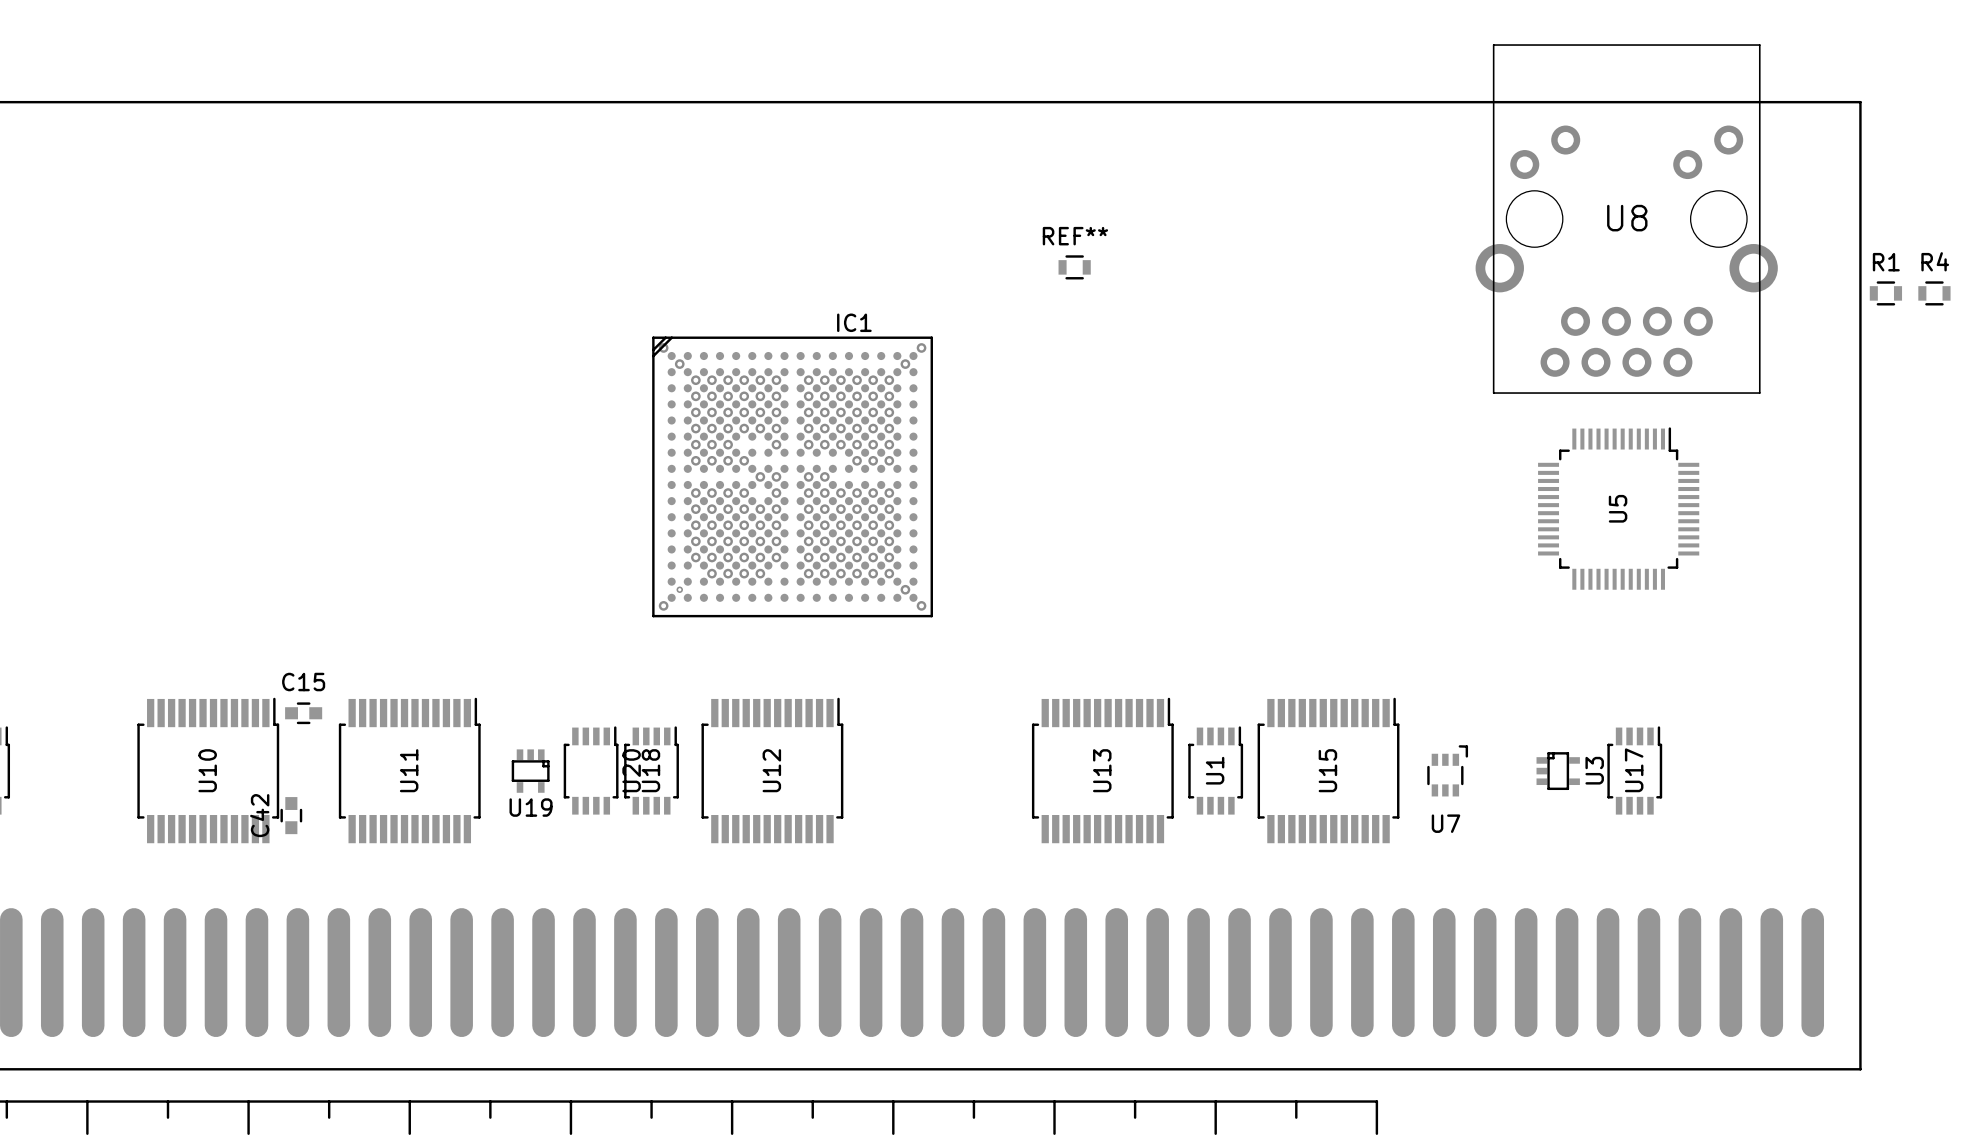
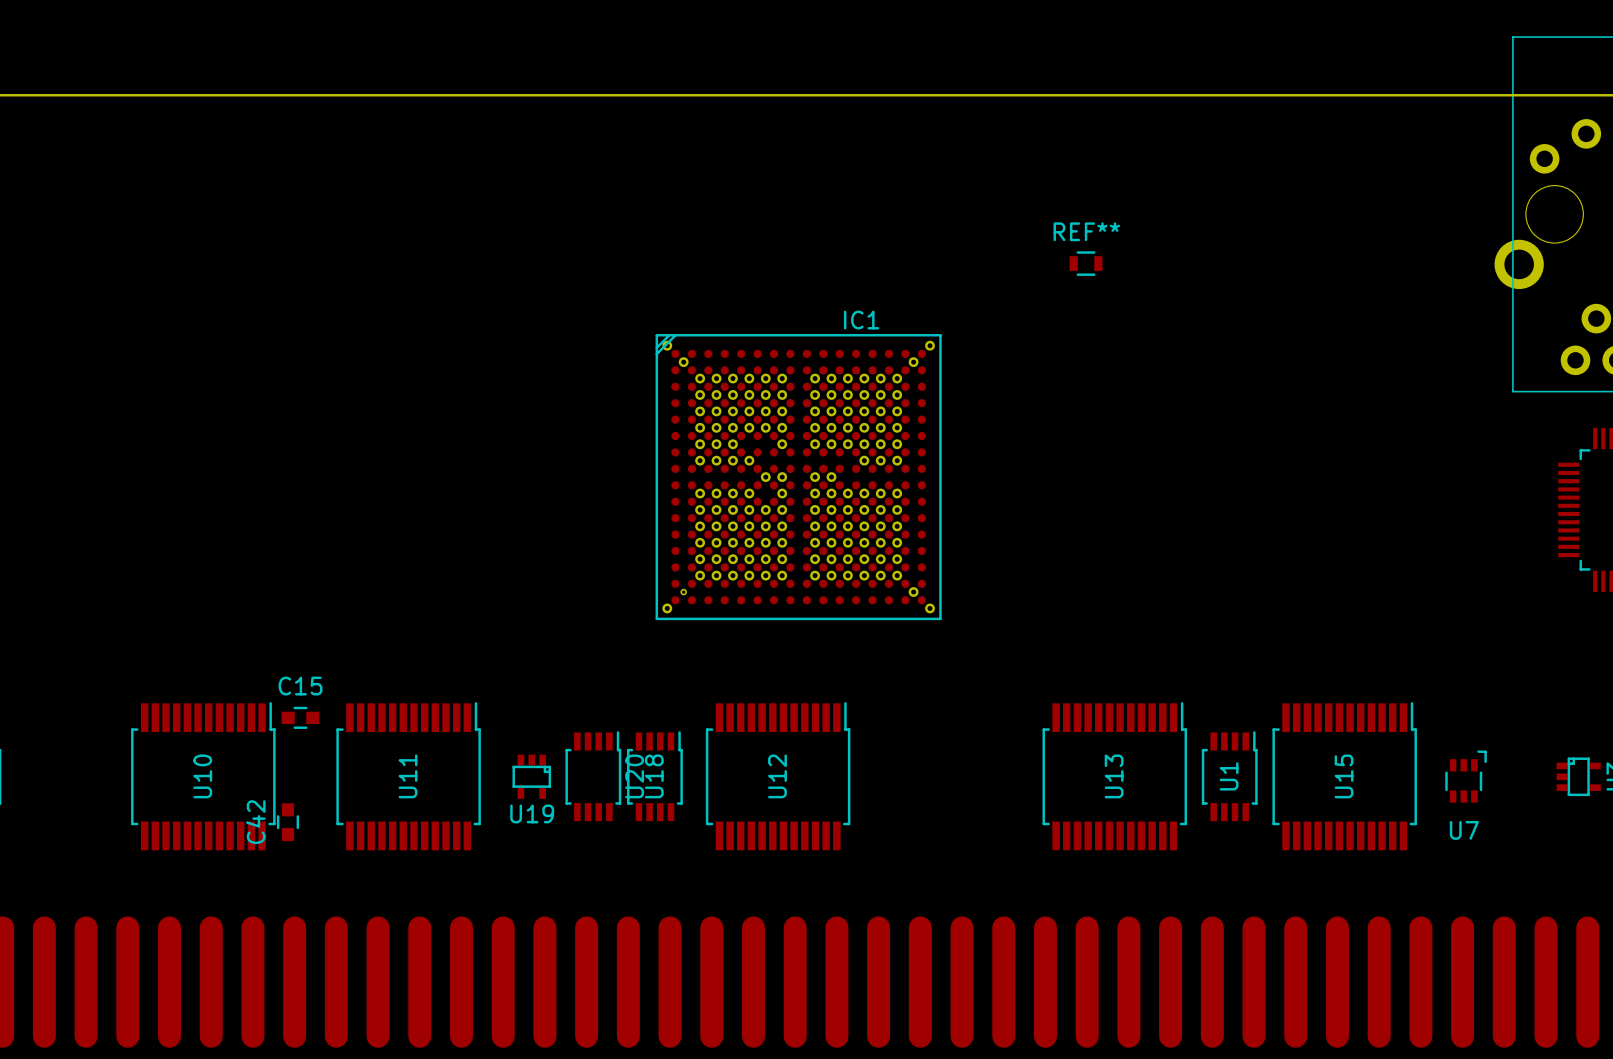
IC1 footprint: [652, 336, 933, 618] -> [655, 334, 942, 621]

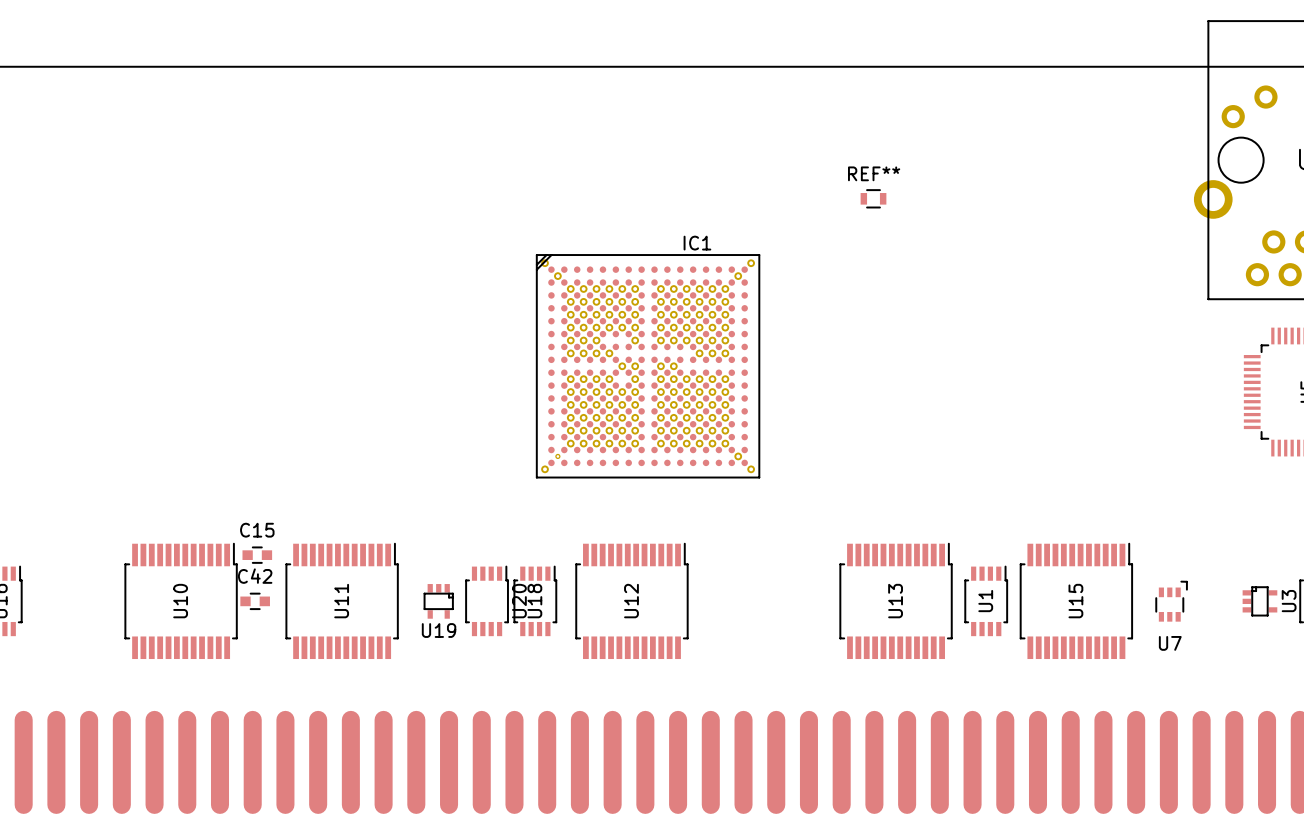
C42 rotation: 0° (287, 822) -> 90° clockwise (255, 601)
C42 position: (287, 822) -> (255, 601)

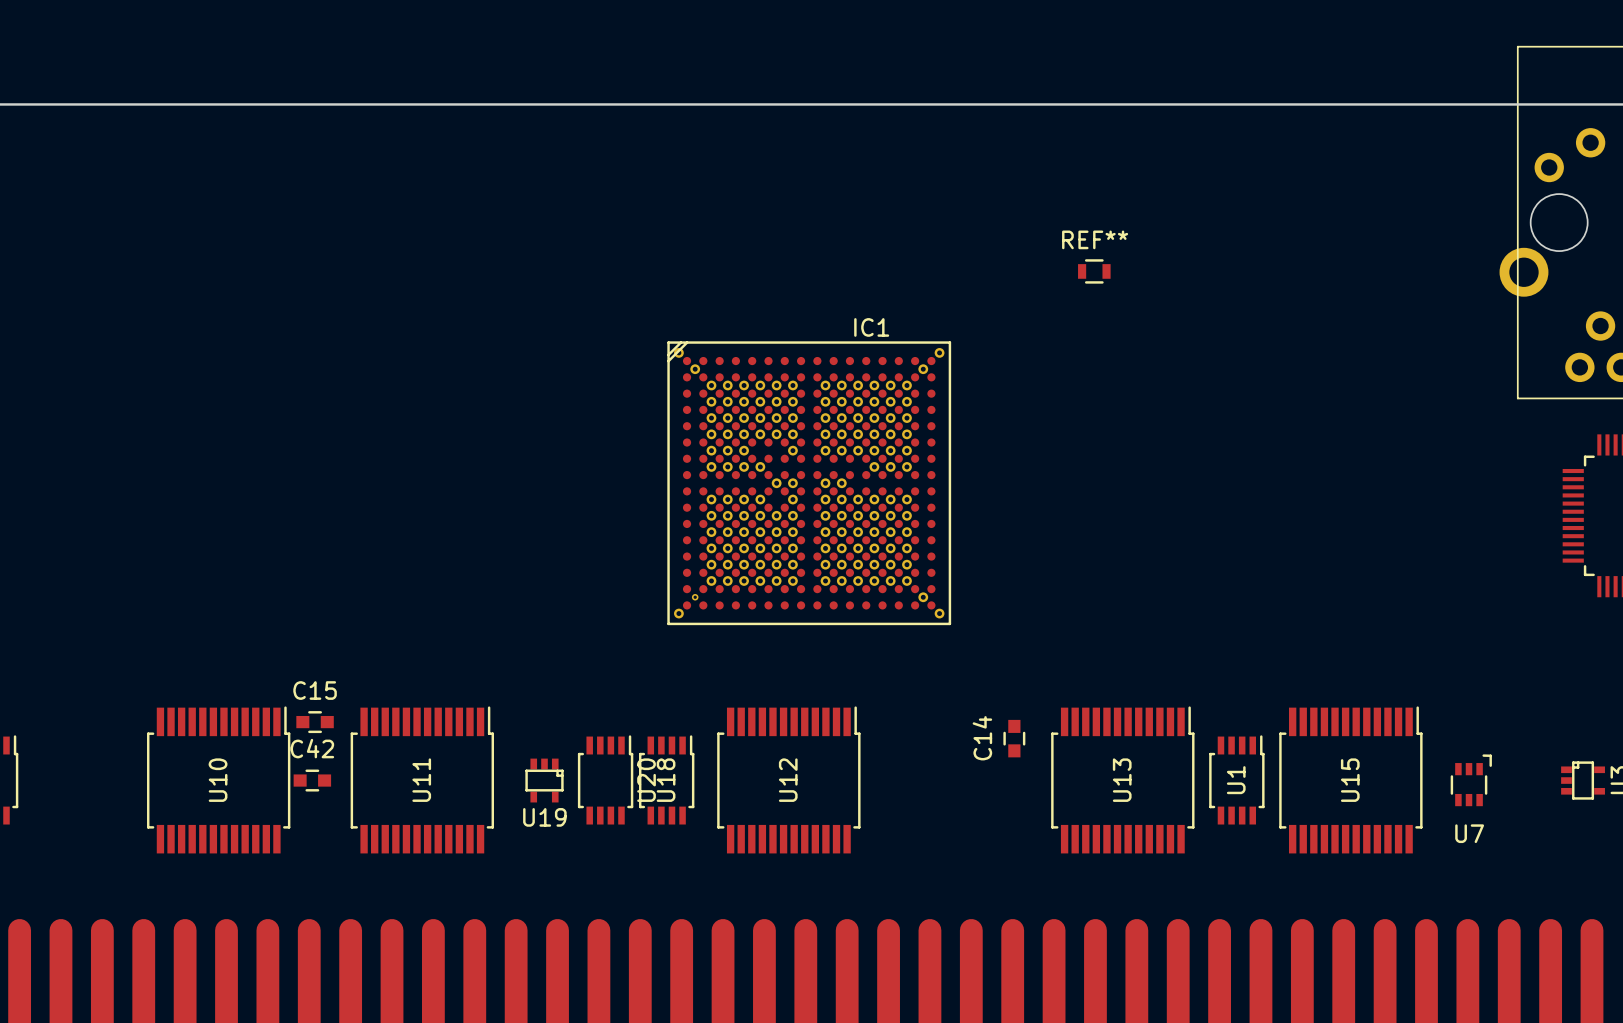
C14: none -> (1014, 738)

